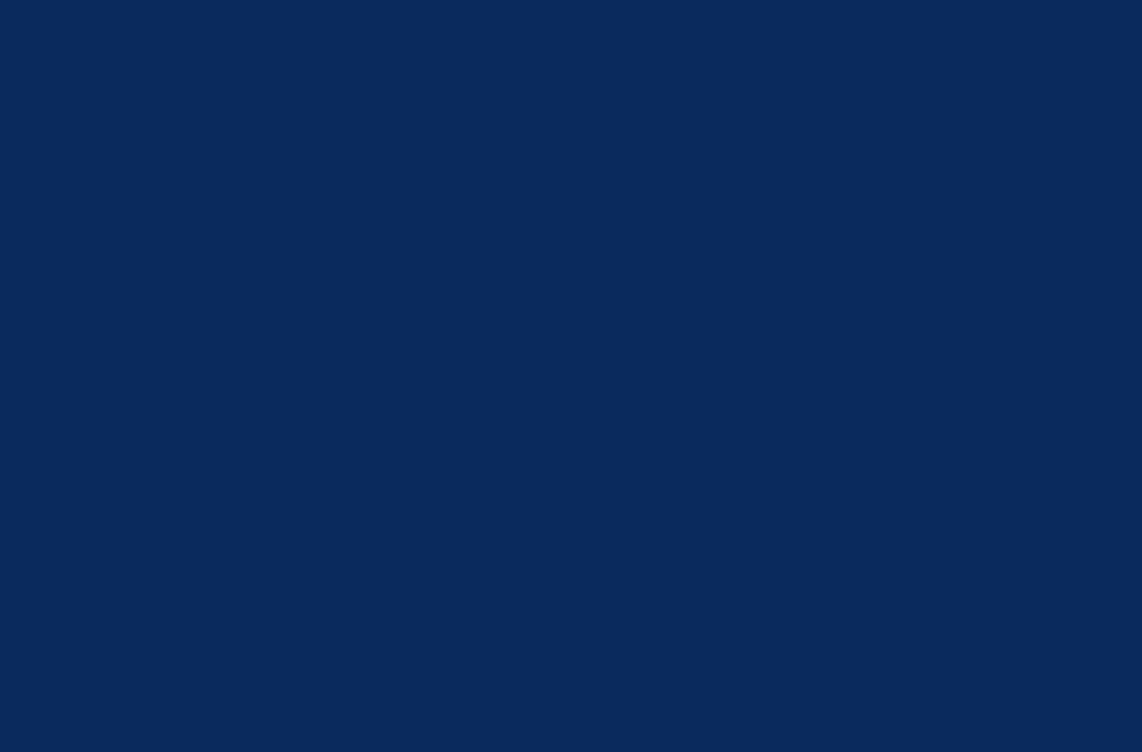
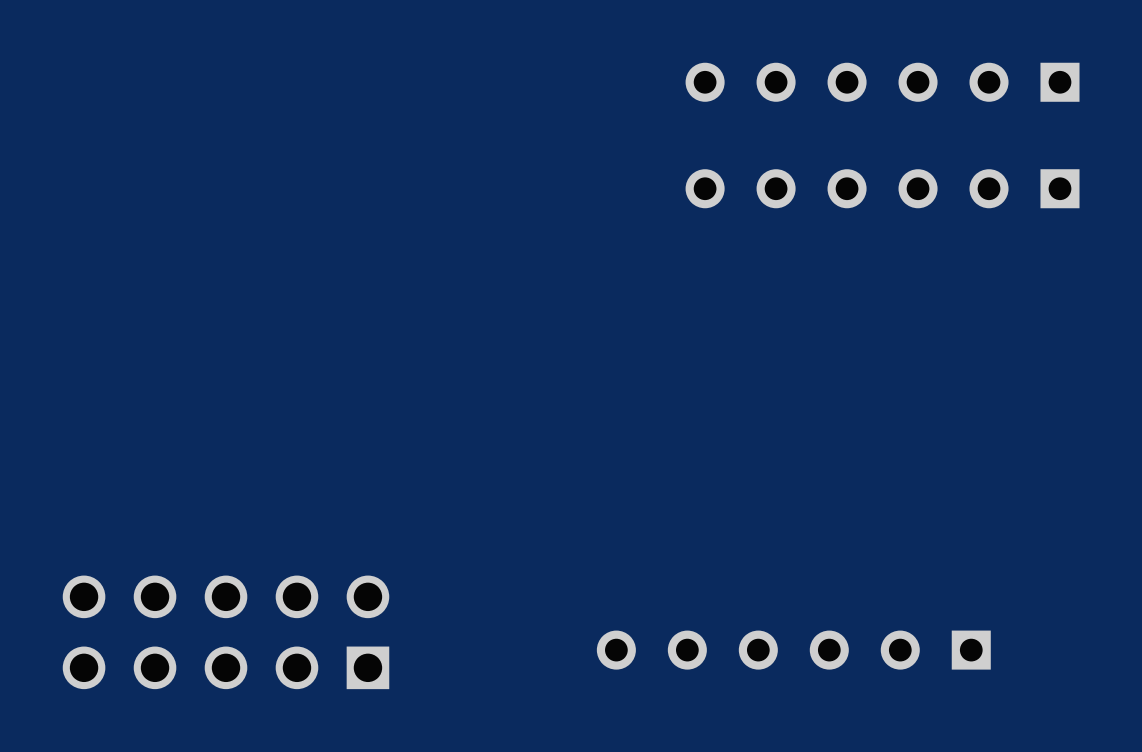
part: none -> (882, 82)
part: none -> (882, 188)
part: none -> (226, 632)
part: none -> (793, 650)

